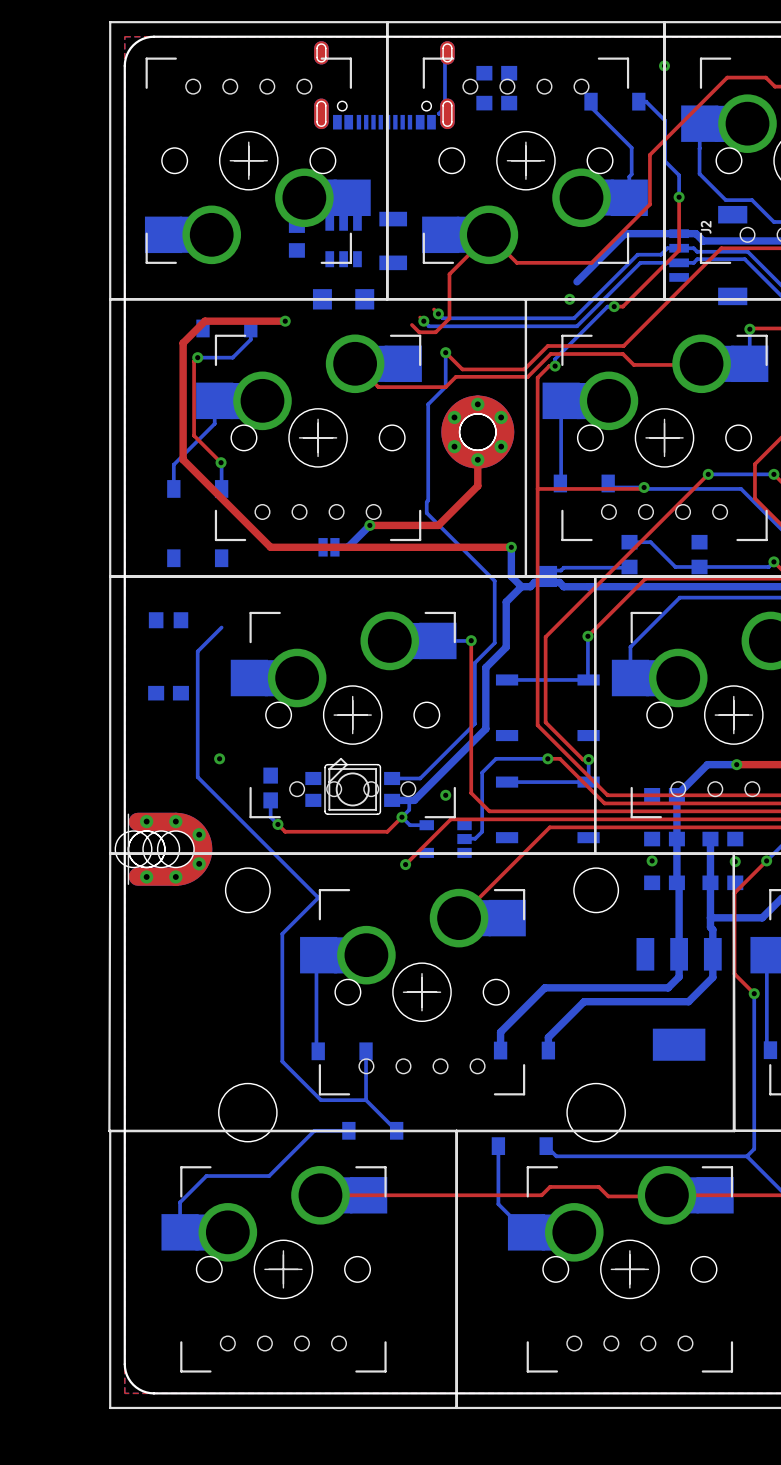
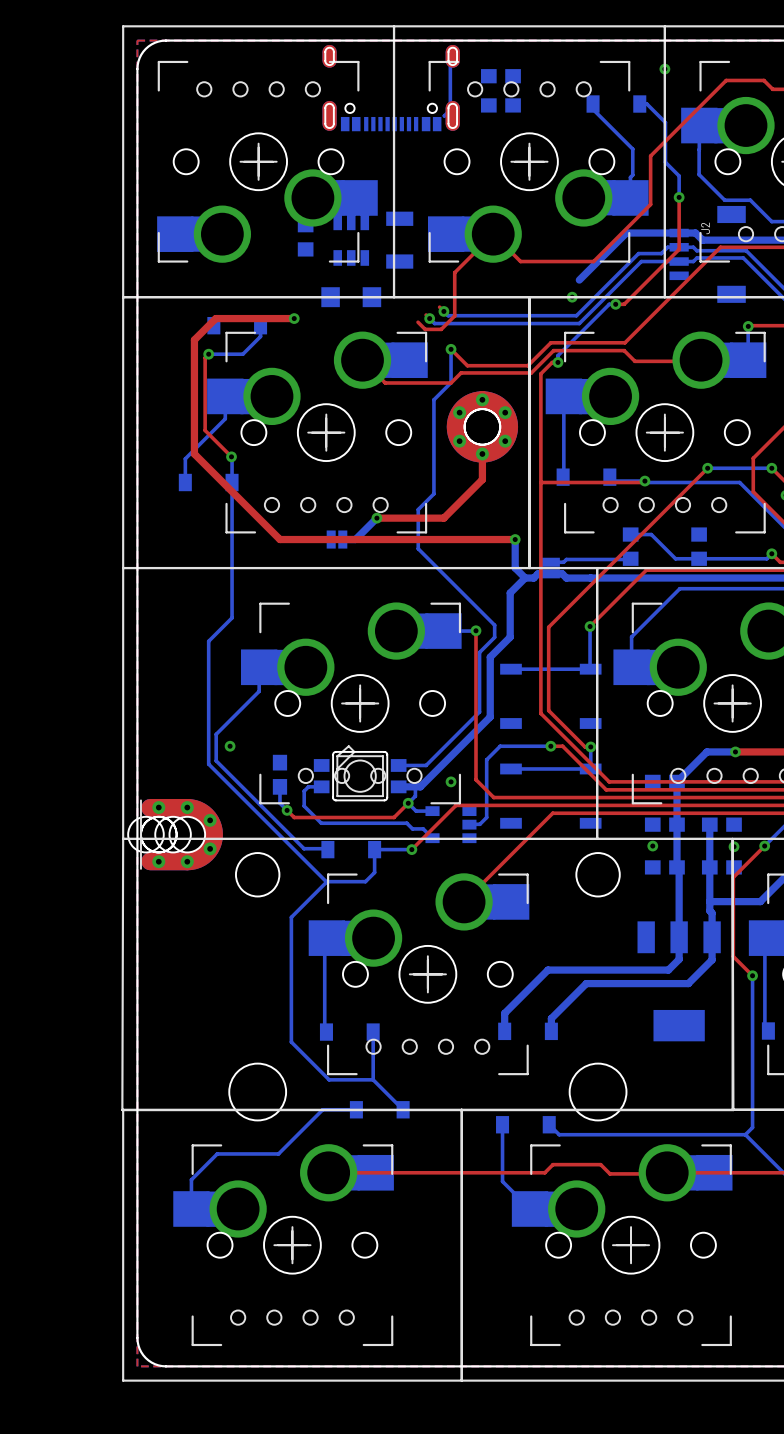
bottom track: none -> (232, 482) (232, 617)
bottom track: (426, 502) (426, 513) (494, 580) (494, 643) (490, 647) -> (432, 495) (418, 509) (418, 548) (494, 625) (494, 637)
part position: (197, 558) -> (351, 849)
part: (168, 620) -> none
bottom track: none -> (259, 667) (259, 691) (216, 734) (216, 760) (304, 848) (327, 849)
part: (168, 693) -> none
bottom track: none -> (321, 786) (308, 786) (304, 791) (304, 806) (321, 823) (406, 823) (412, 828) (423, 828) (432, 838)
bottom track: none -> (411, 849) (374, 849) (374, 872) (365, 881) (326, 881)

